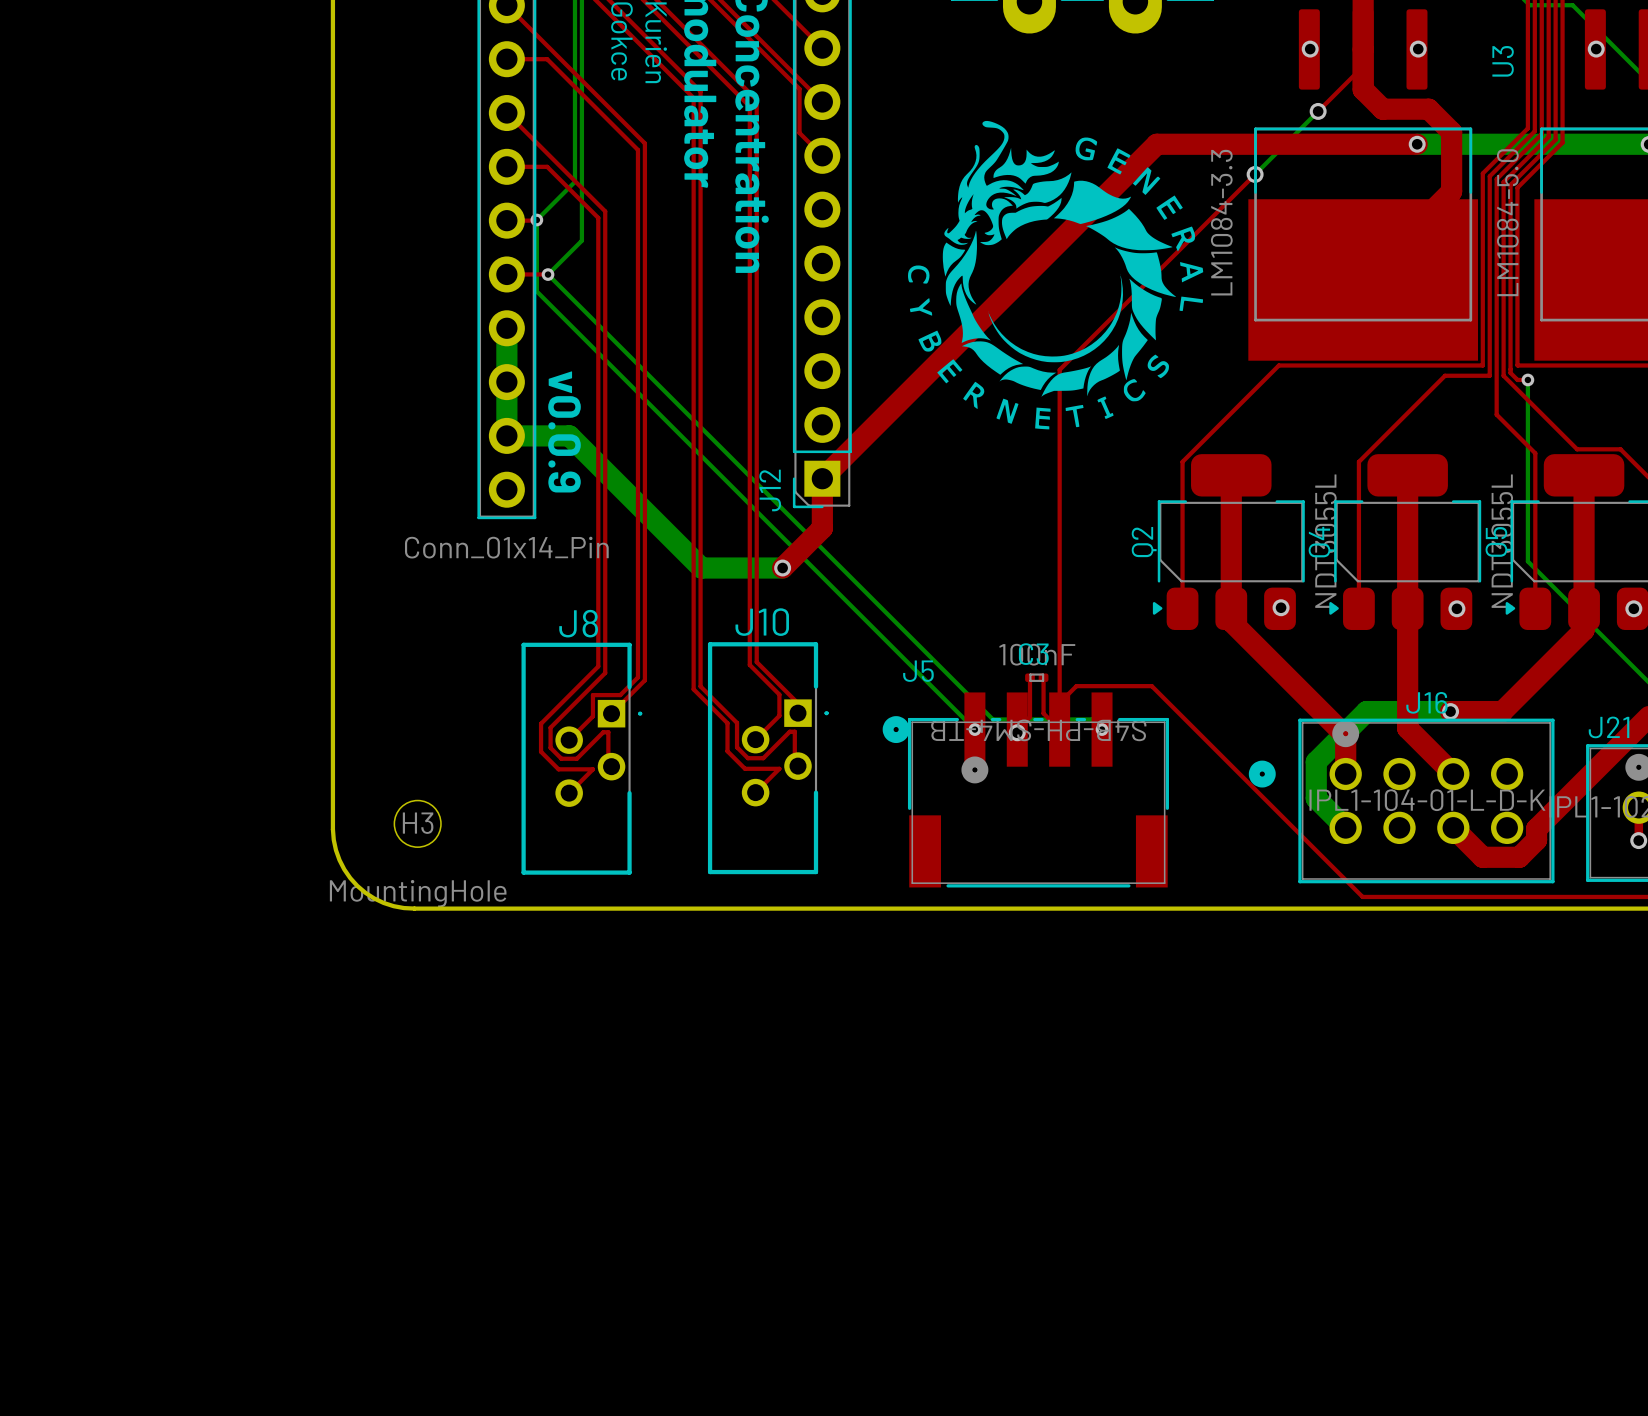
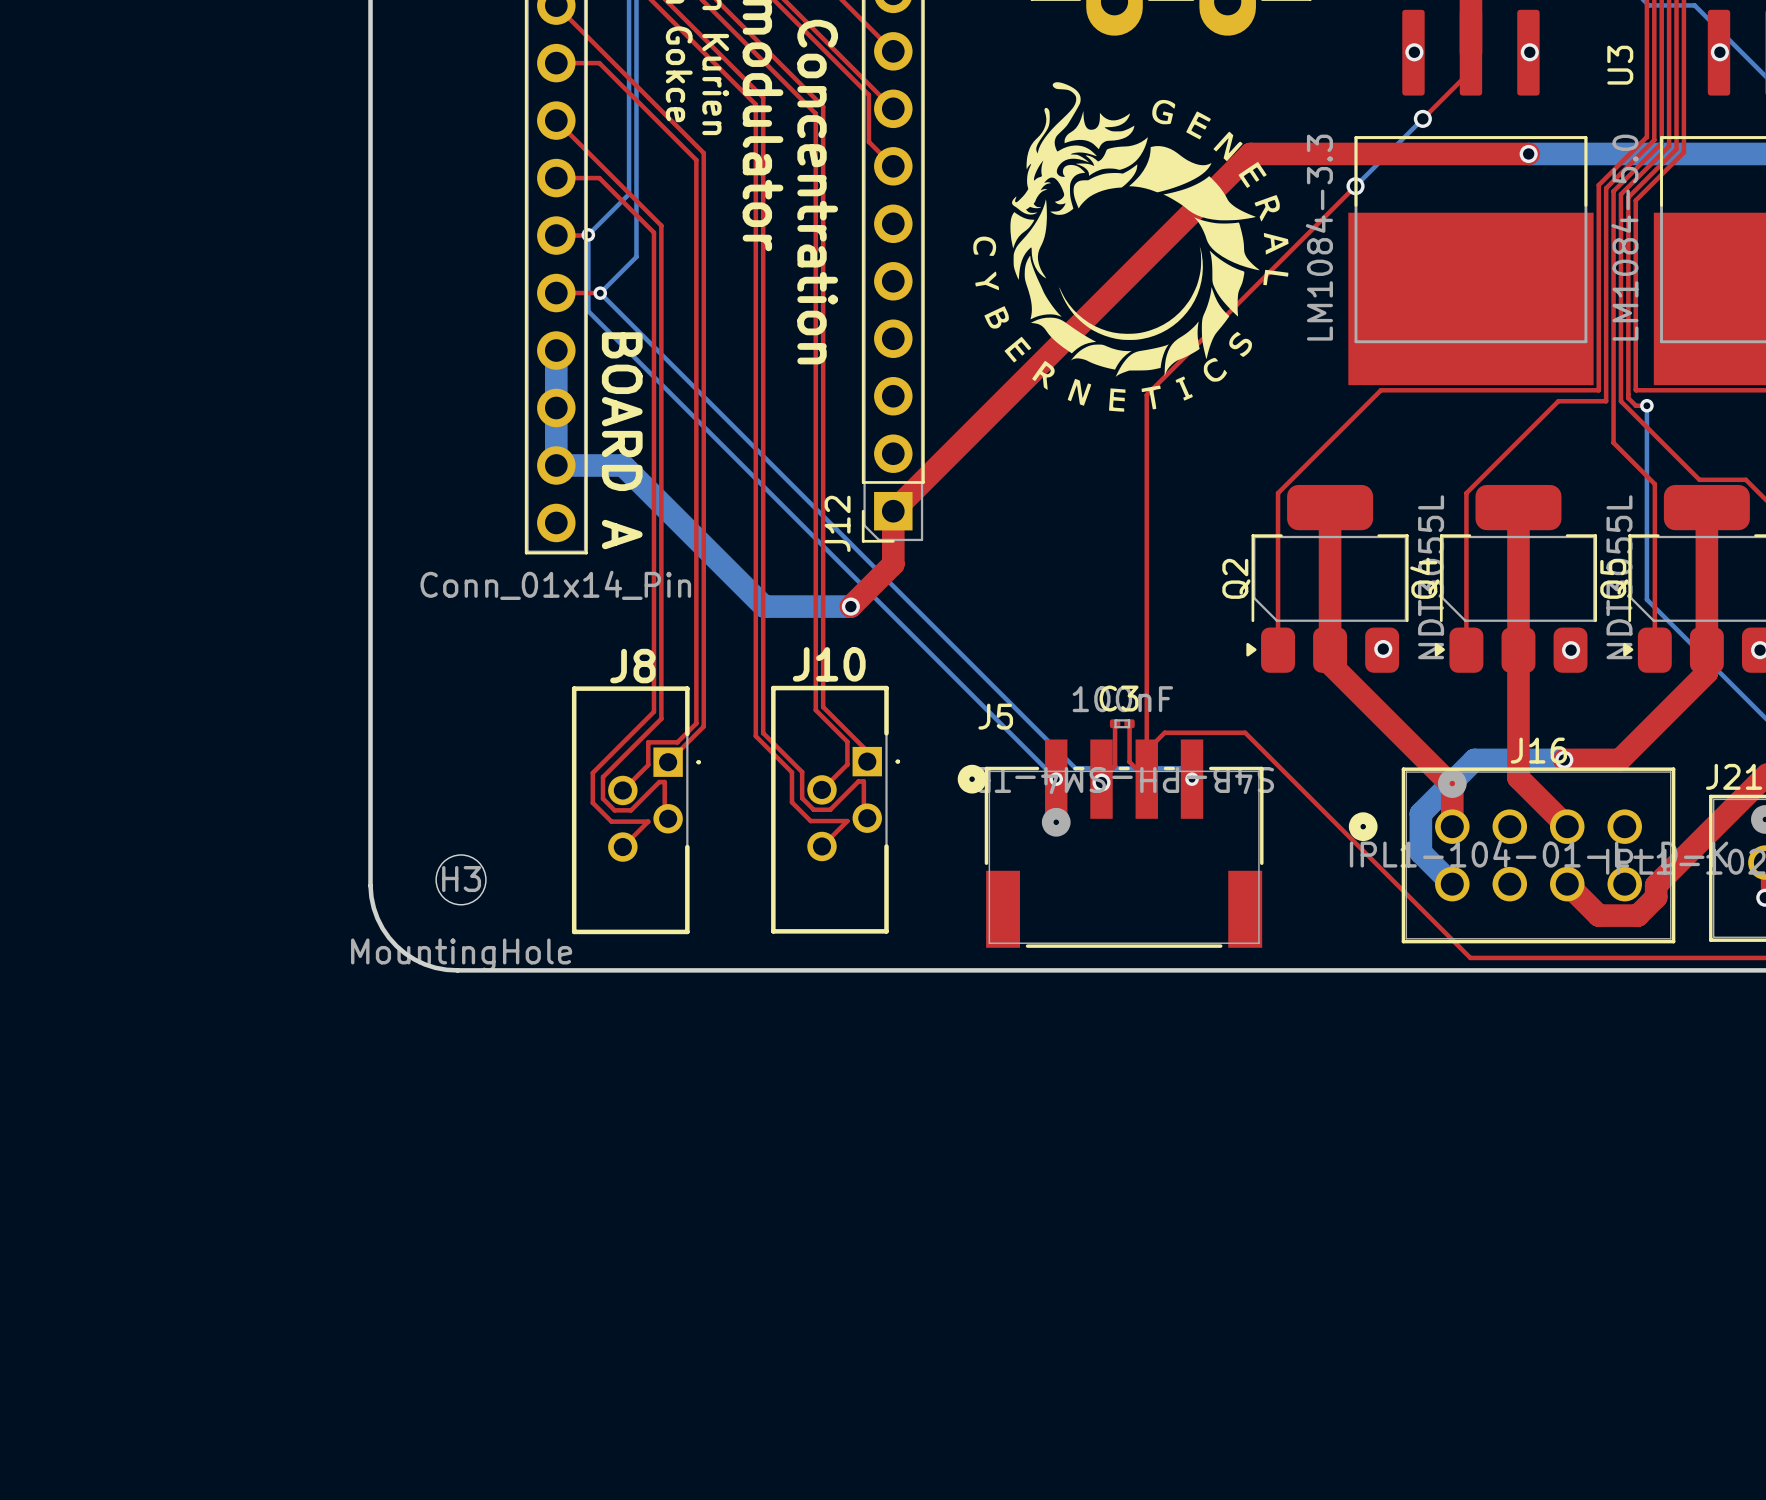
top track: (1363, 49) (1363, 89) (1382, 109) (1428, 109) (1451, 132) (1451, 191) (1363, 279) -> none
drawing position: (1055, 275) -> (1130, 246)
text: none -> BOARD A (622, 440)
text: v0.0.9 (564, 431) -> none

